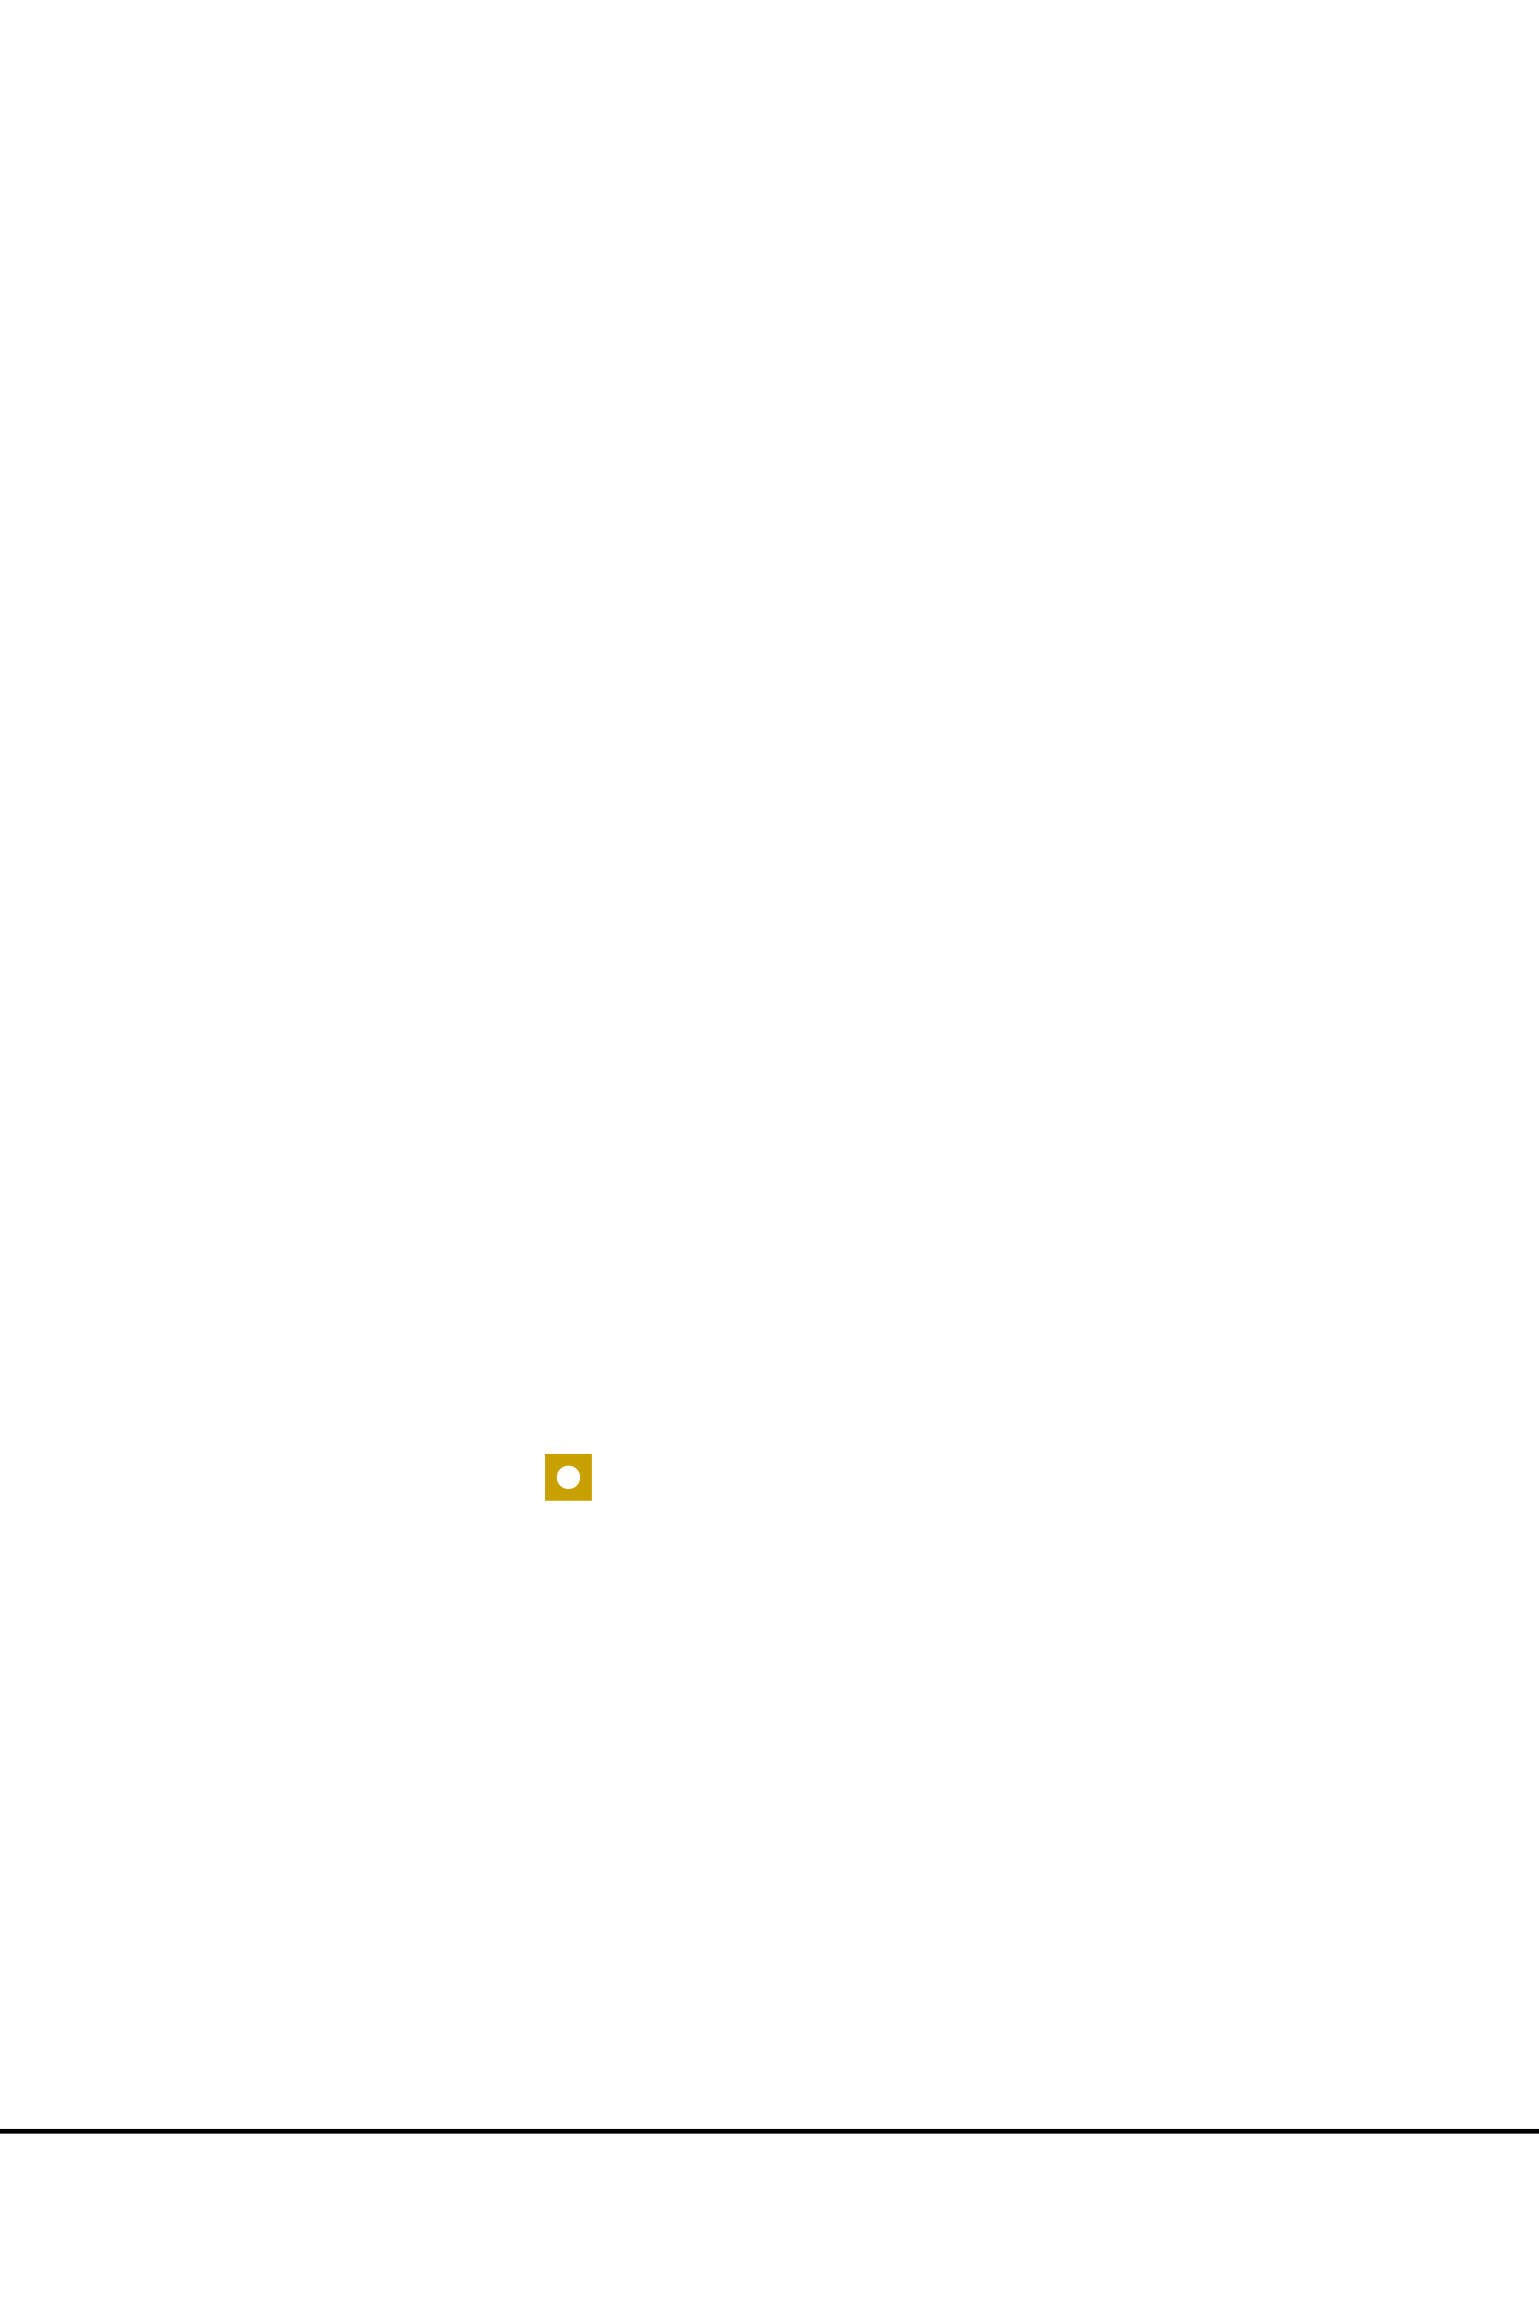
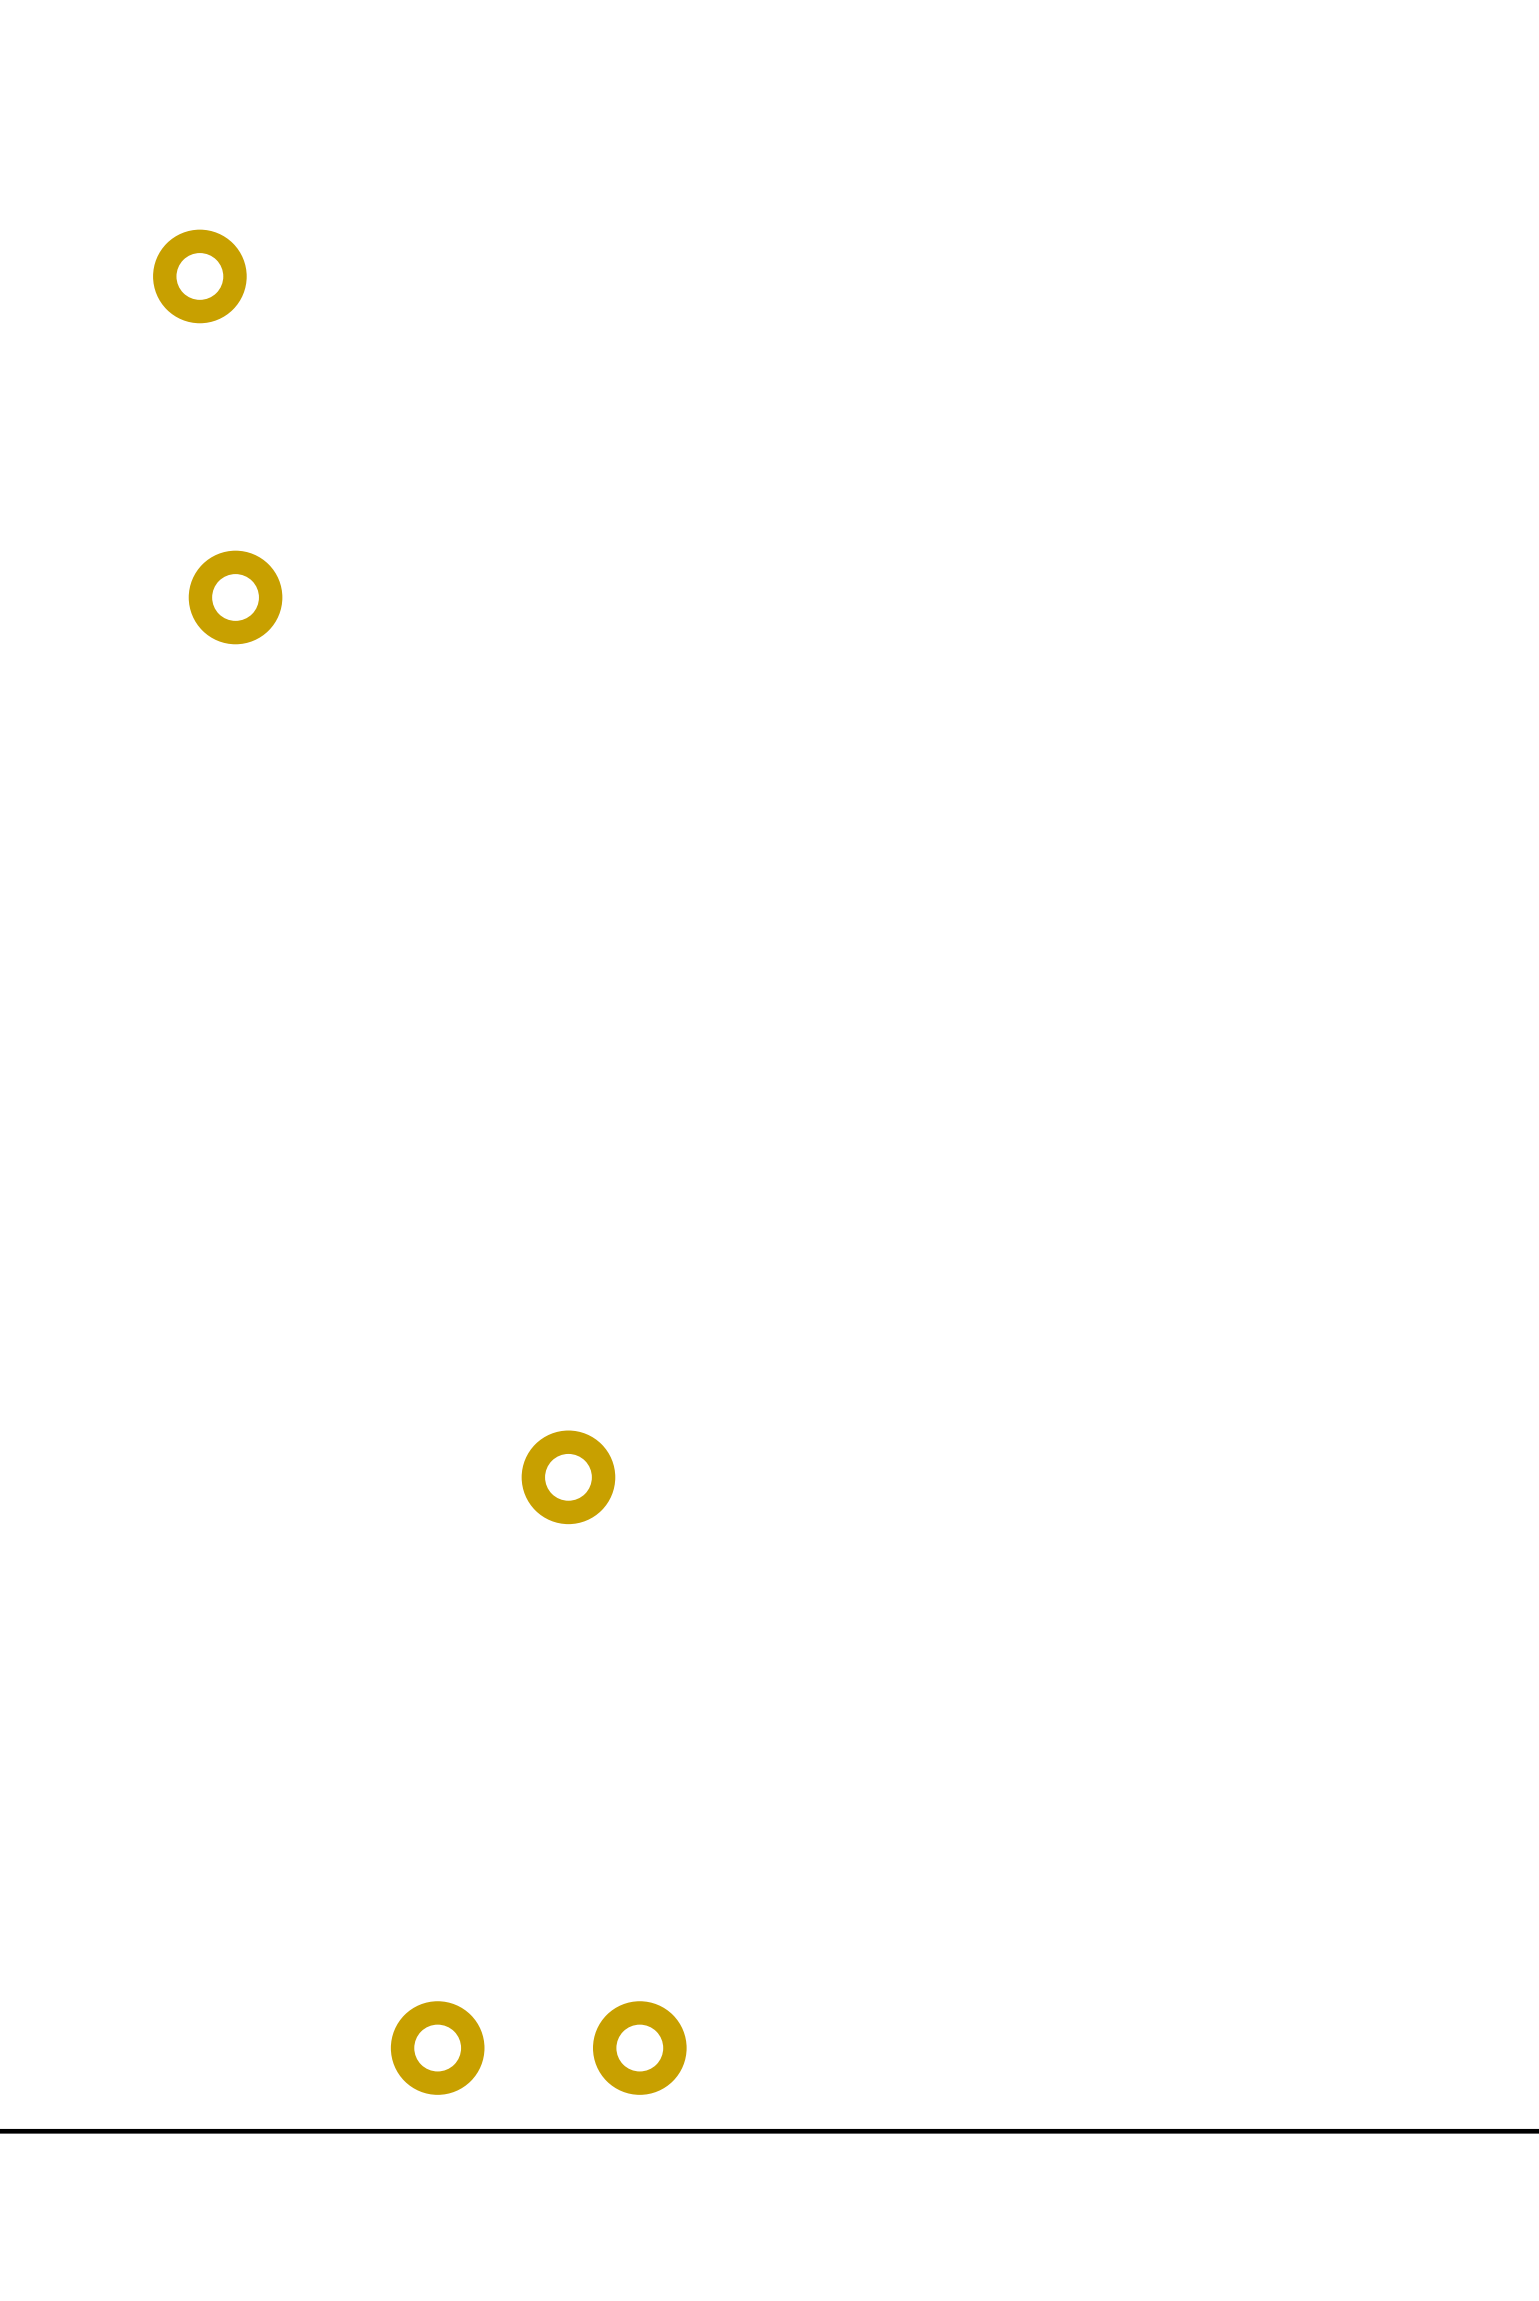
part: none -> (199, 276)
part: none -> (235, 597)
part footprint: [545, 1453, 592, 1501] -> [521, 1430, 616, 1525]
part: none -> (437, 2048)
part: none -> (639, 2048)

